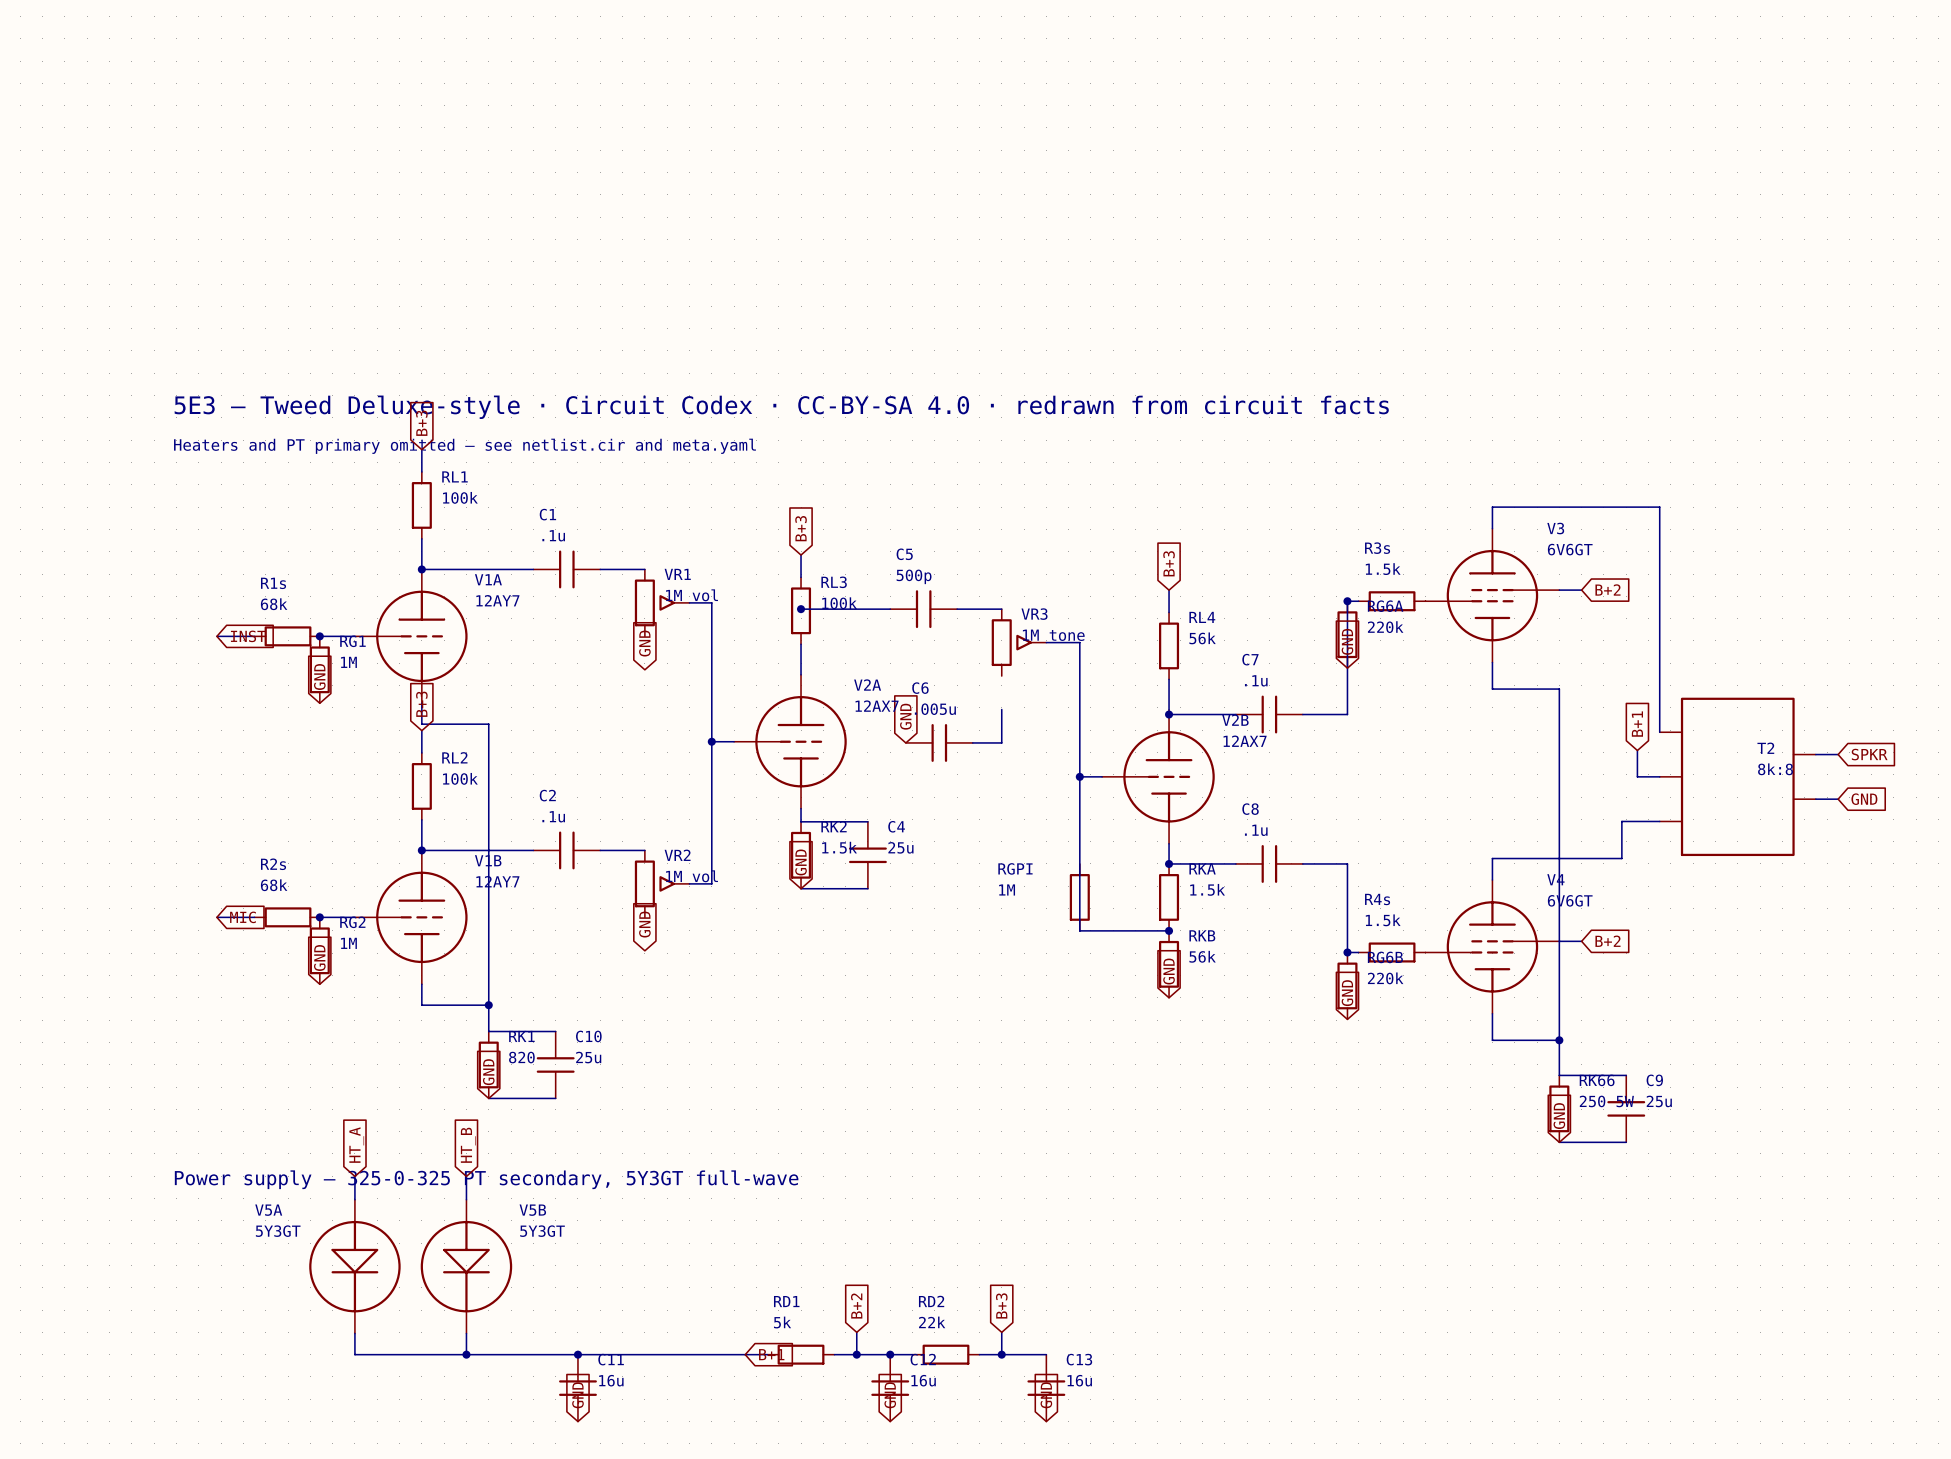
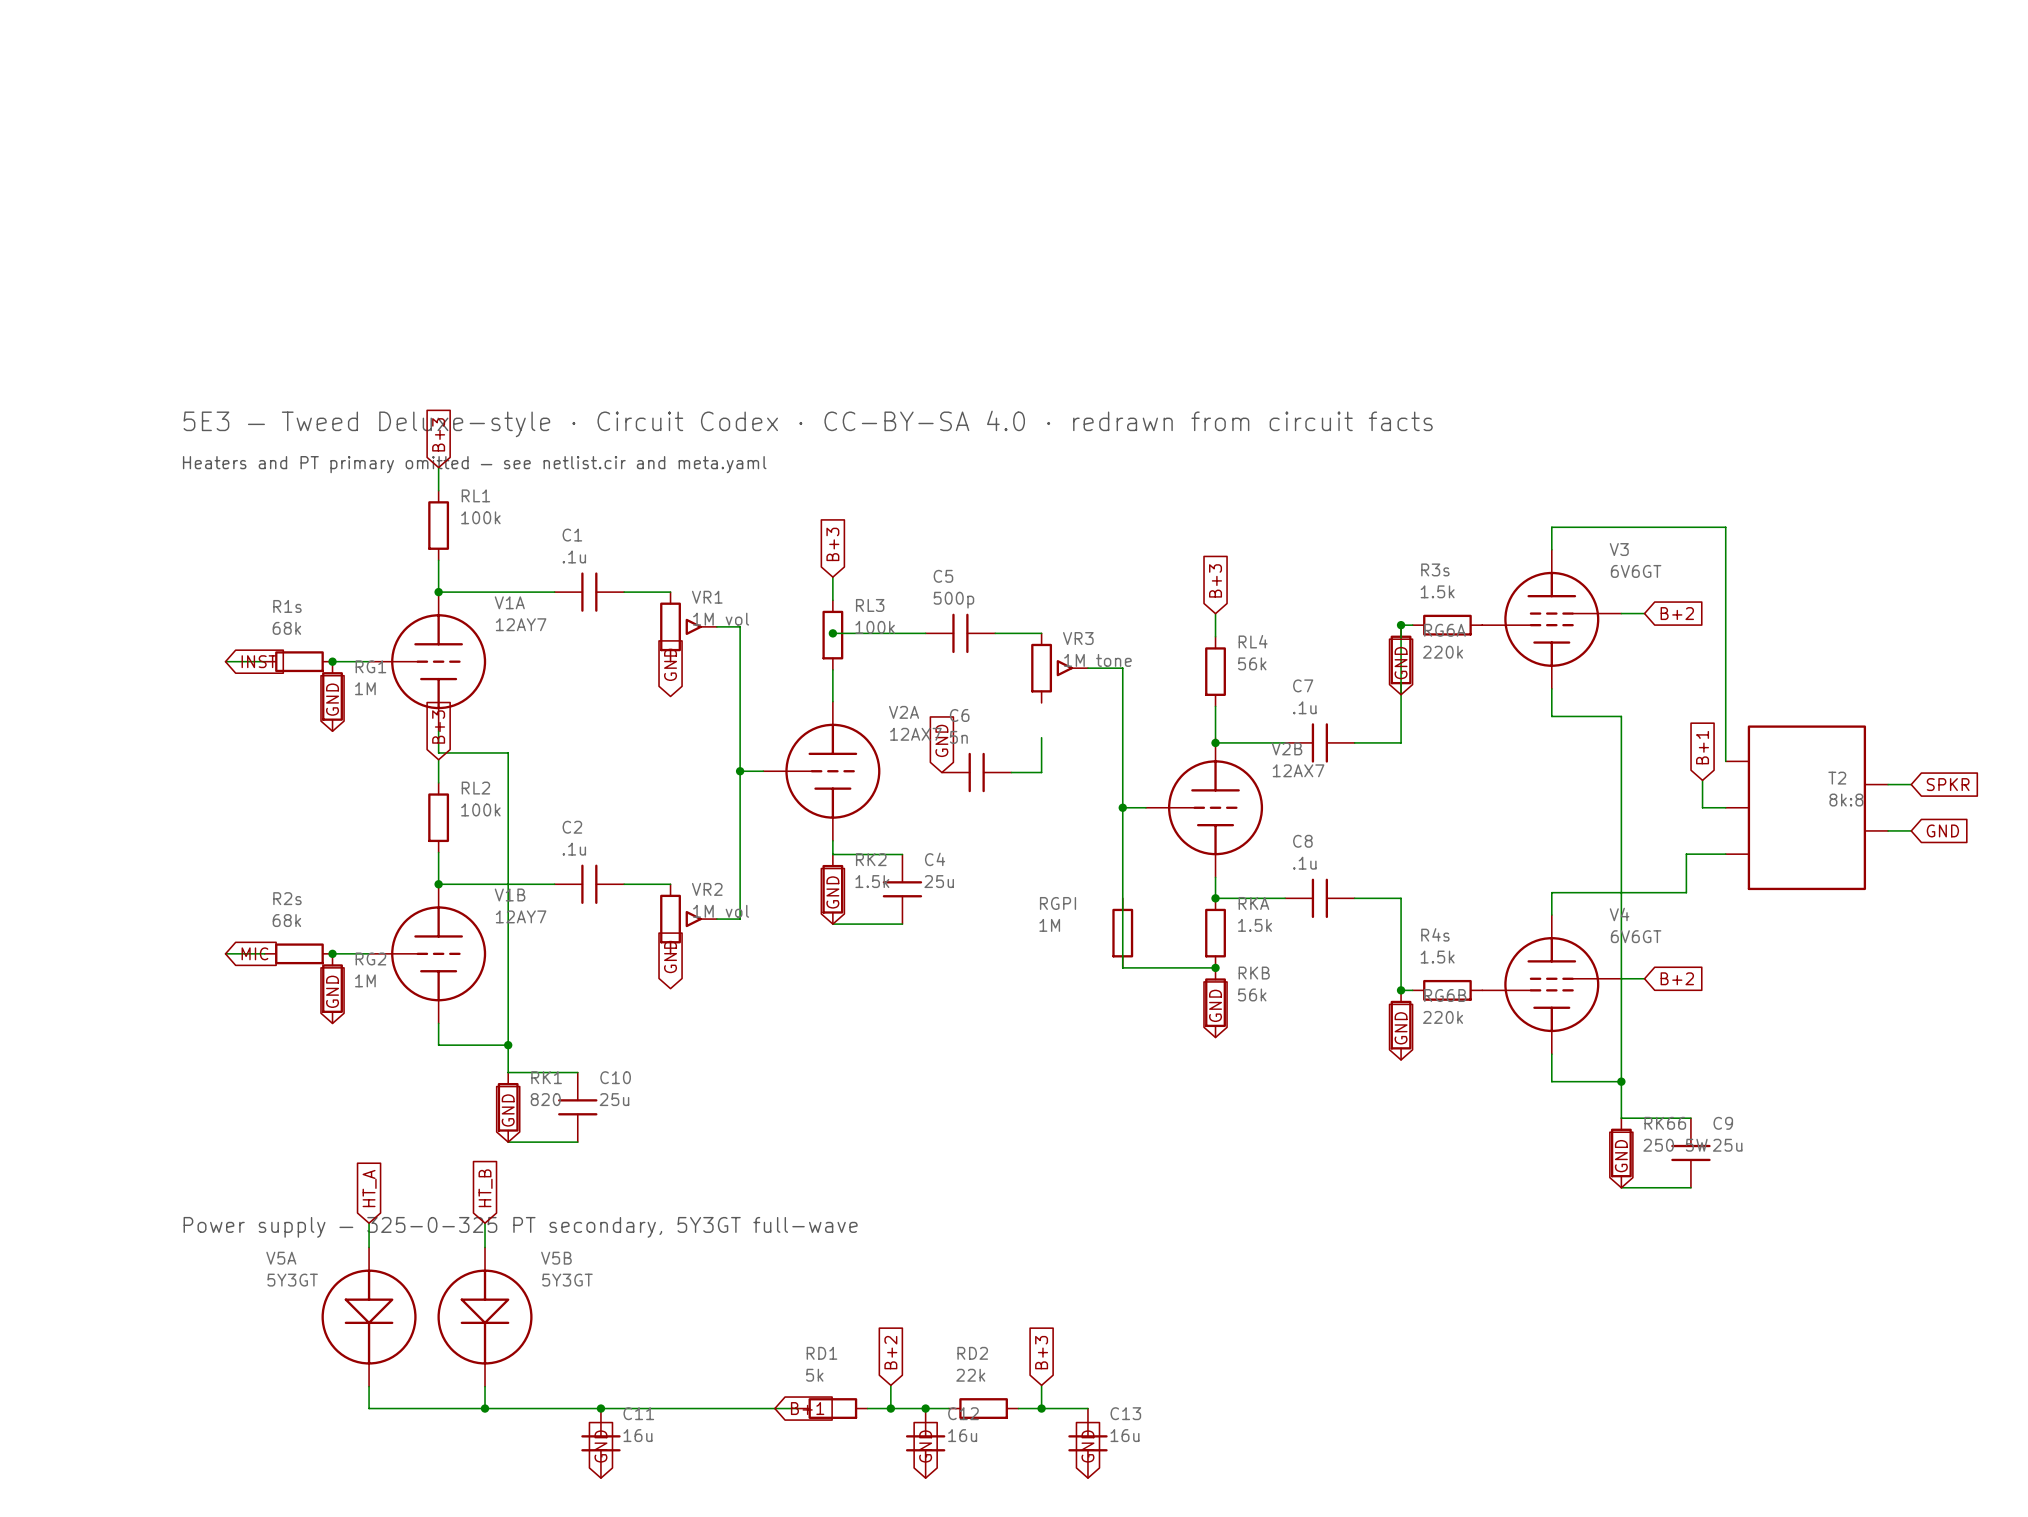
C6 value: .005u (935, 709) -> 5n (958, 737)

